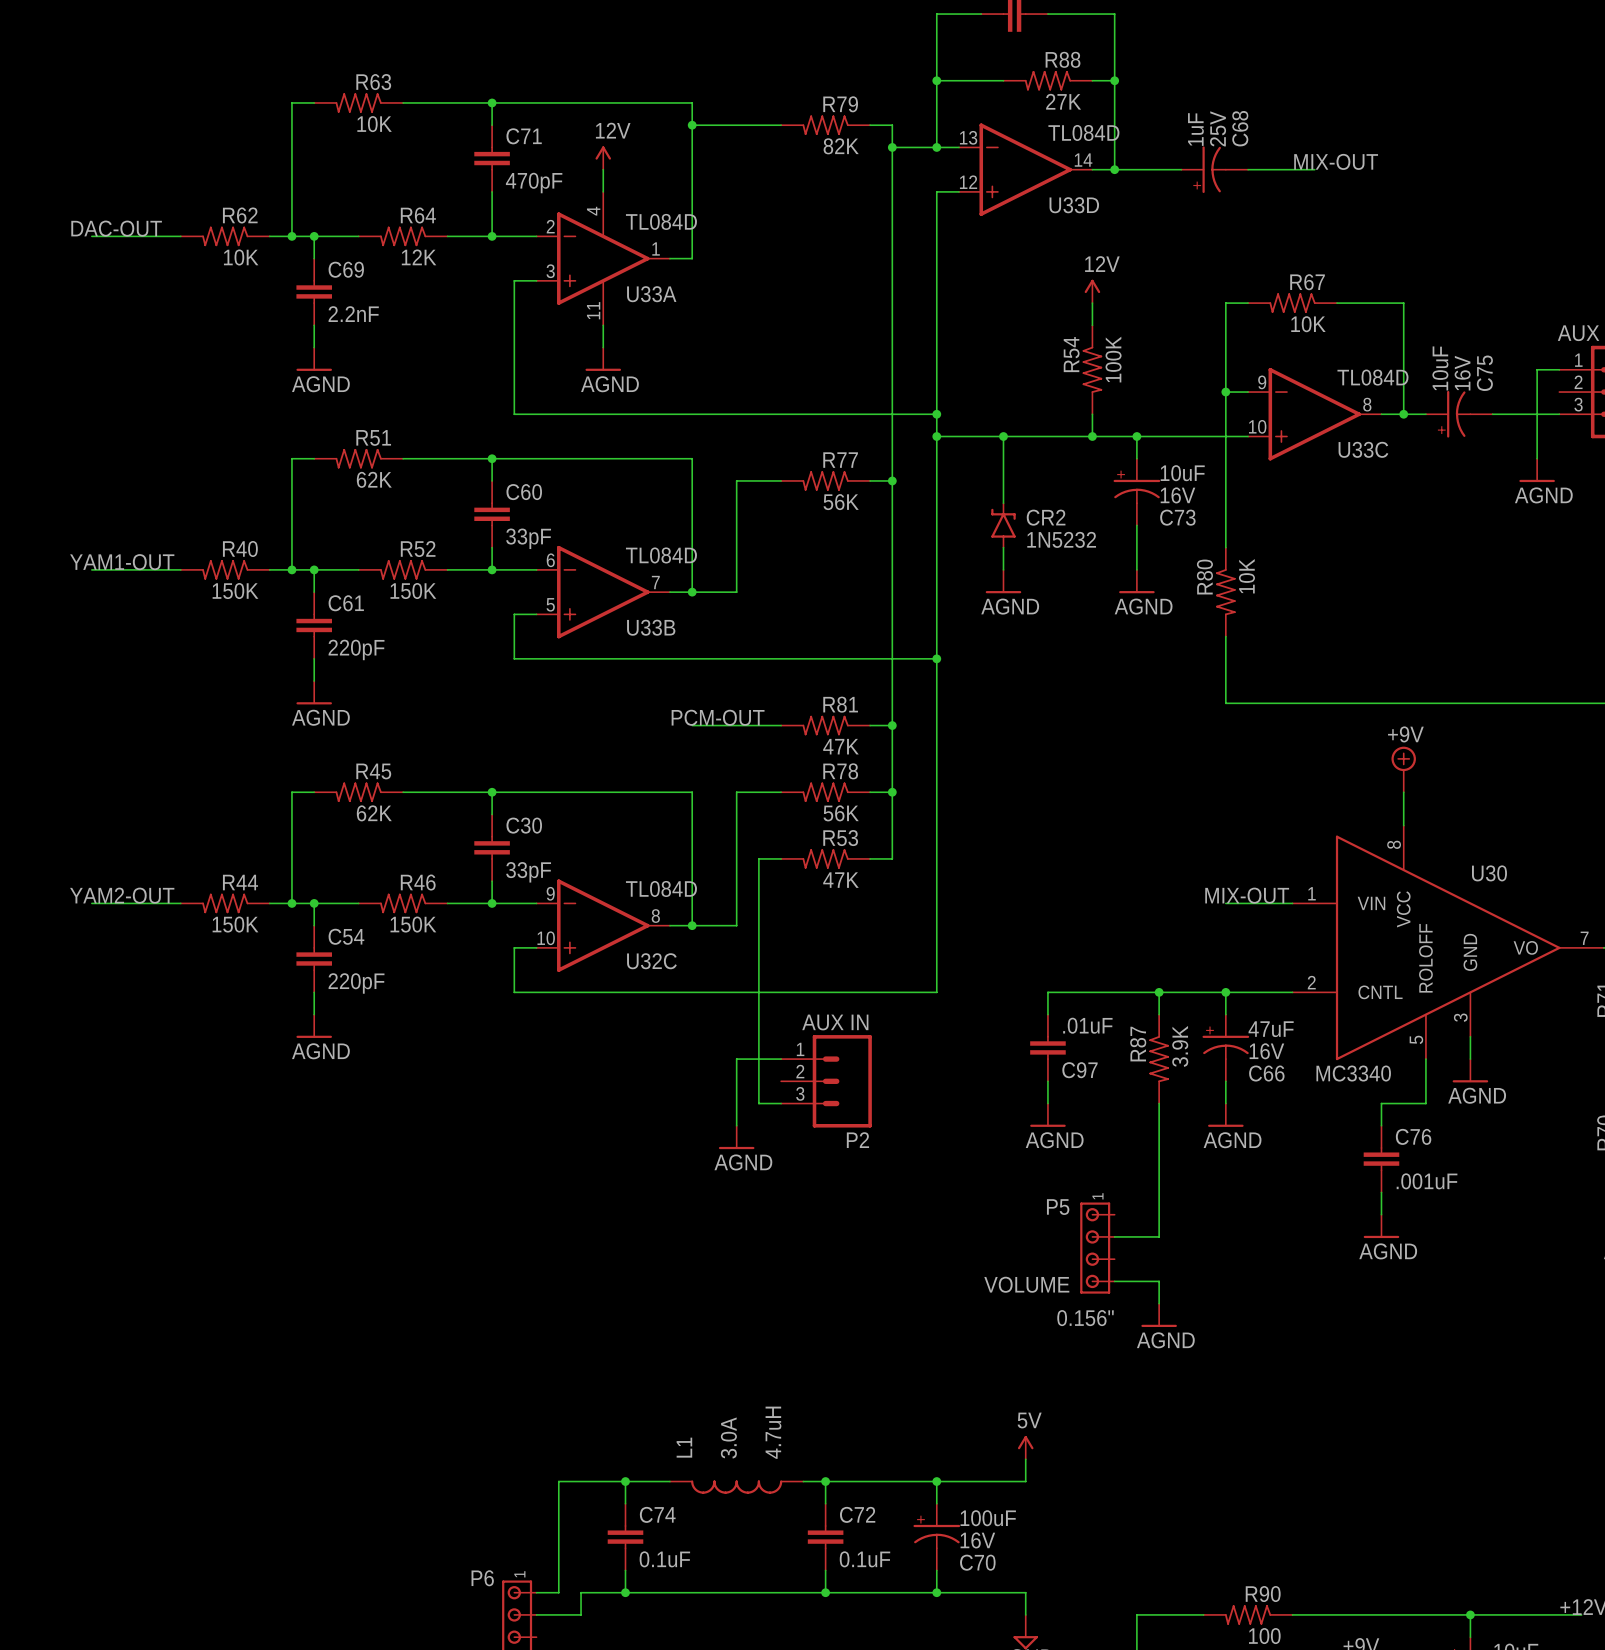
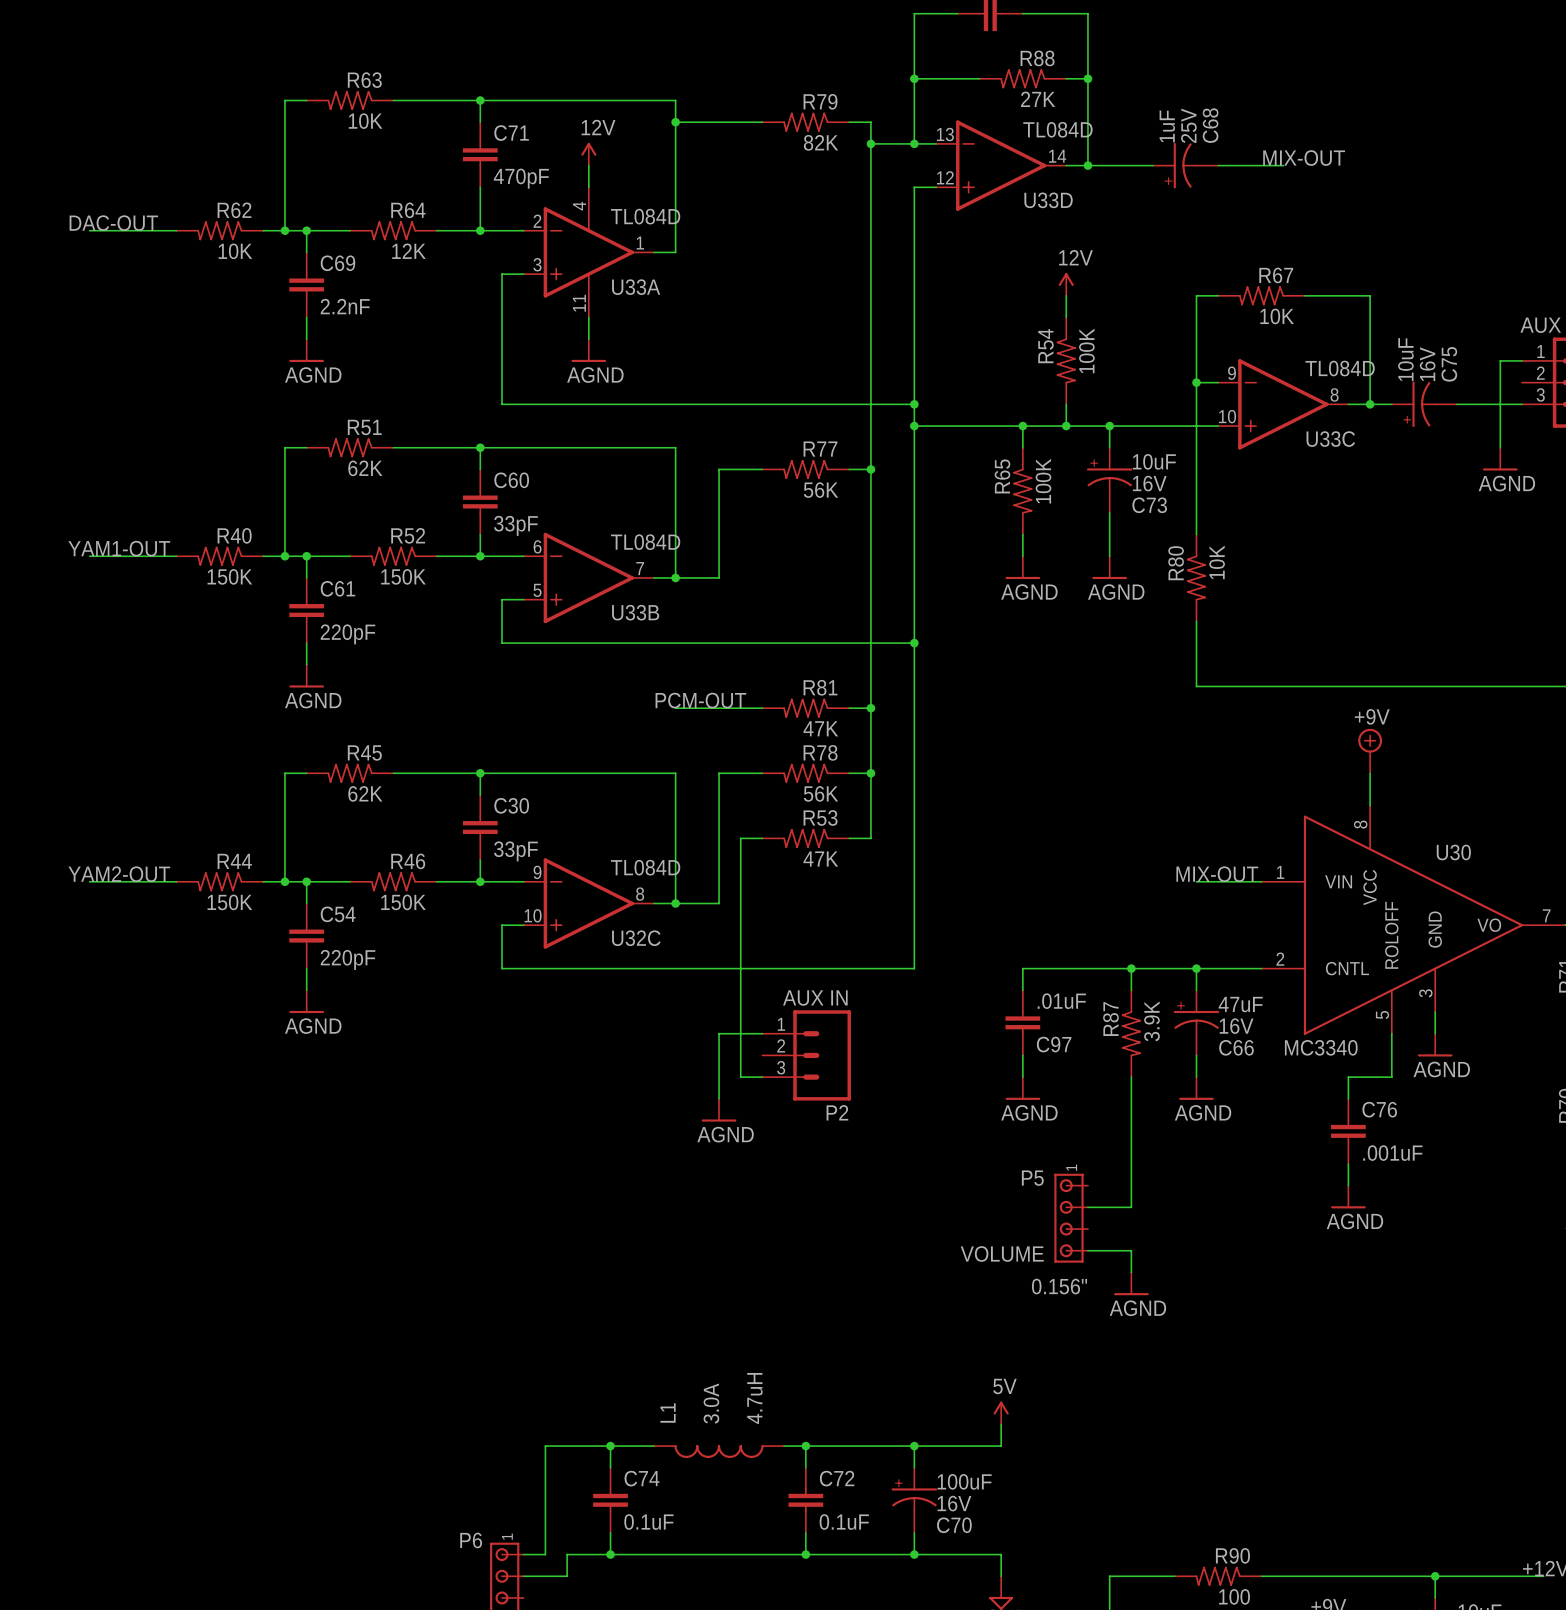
wire: (1003, 436) (1003, 503) -> none
junction position: (1003, 436) -> (1022, 426)
wire: none -> (1022, 426) (1022, 447)
R65: none -> 100K (1022, 491)
CR2: 1N5232 (1003, 525) -> none
wire: (1003, 547) (1003, 569) -> (1022, 534) (1022, 556)
power symbol position: AGND (1003, 581) -> AGND (1022, 567)

